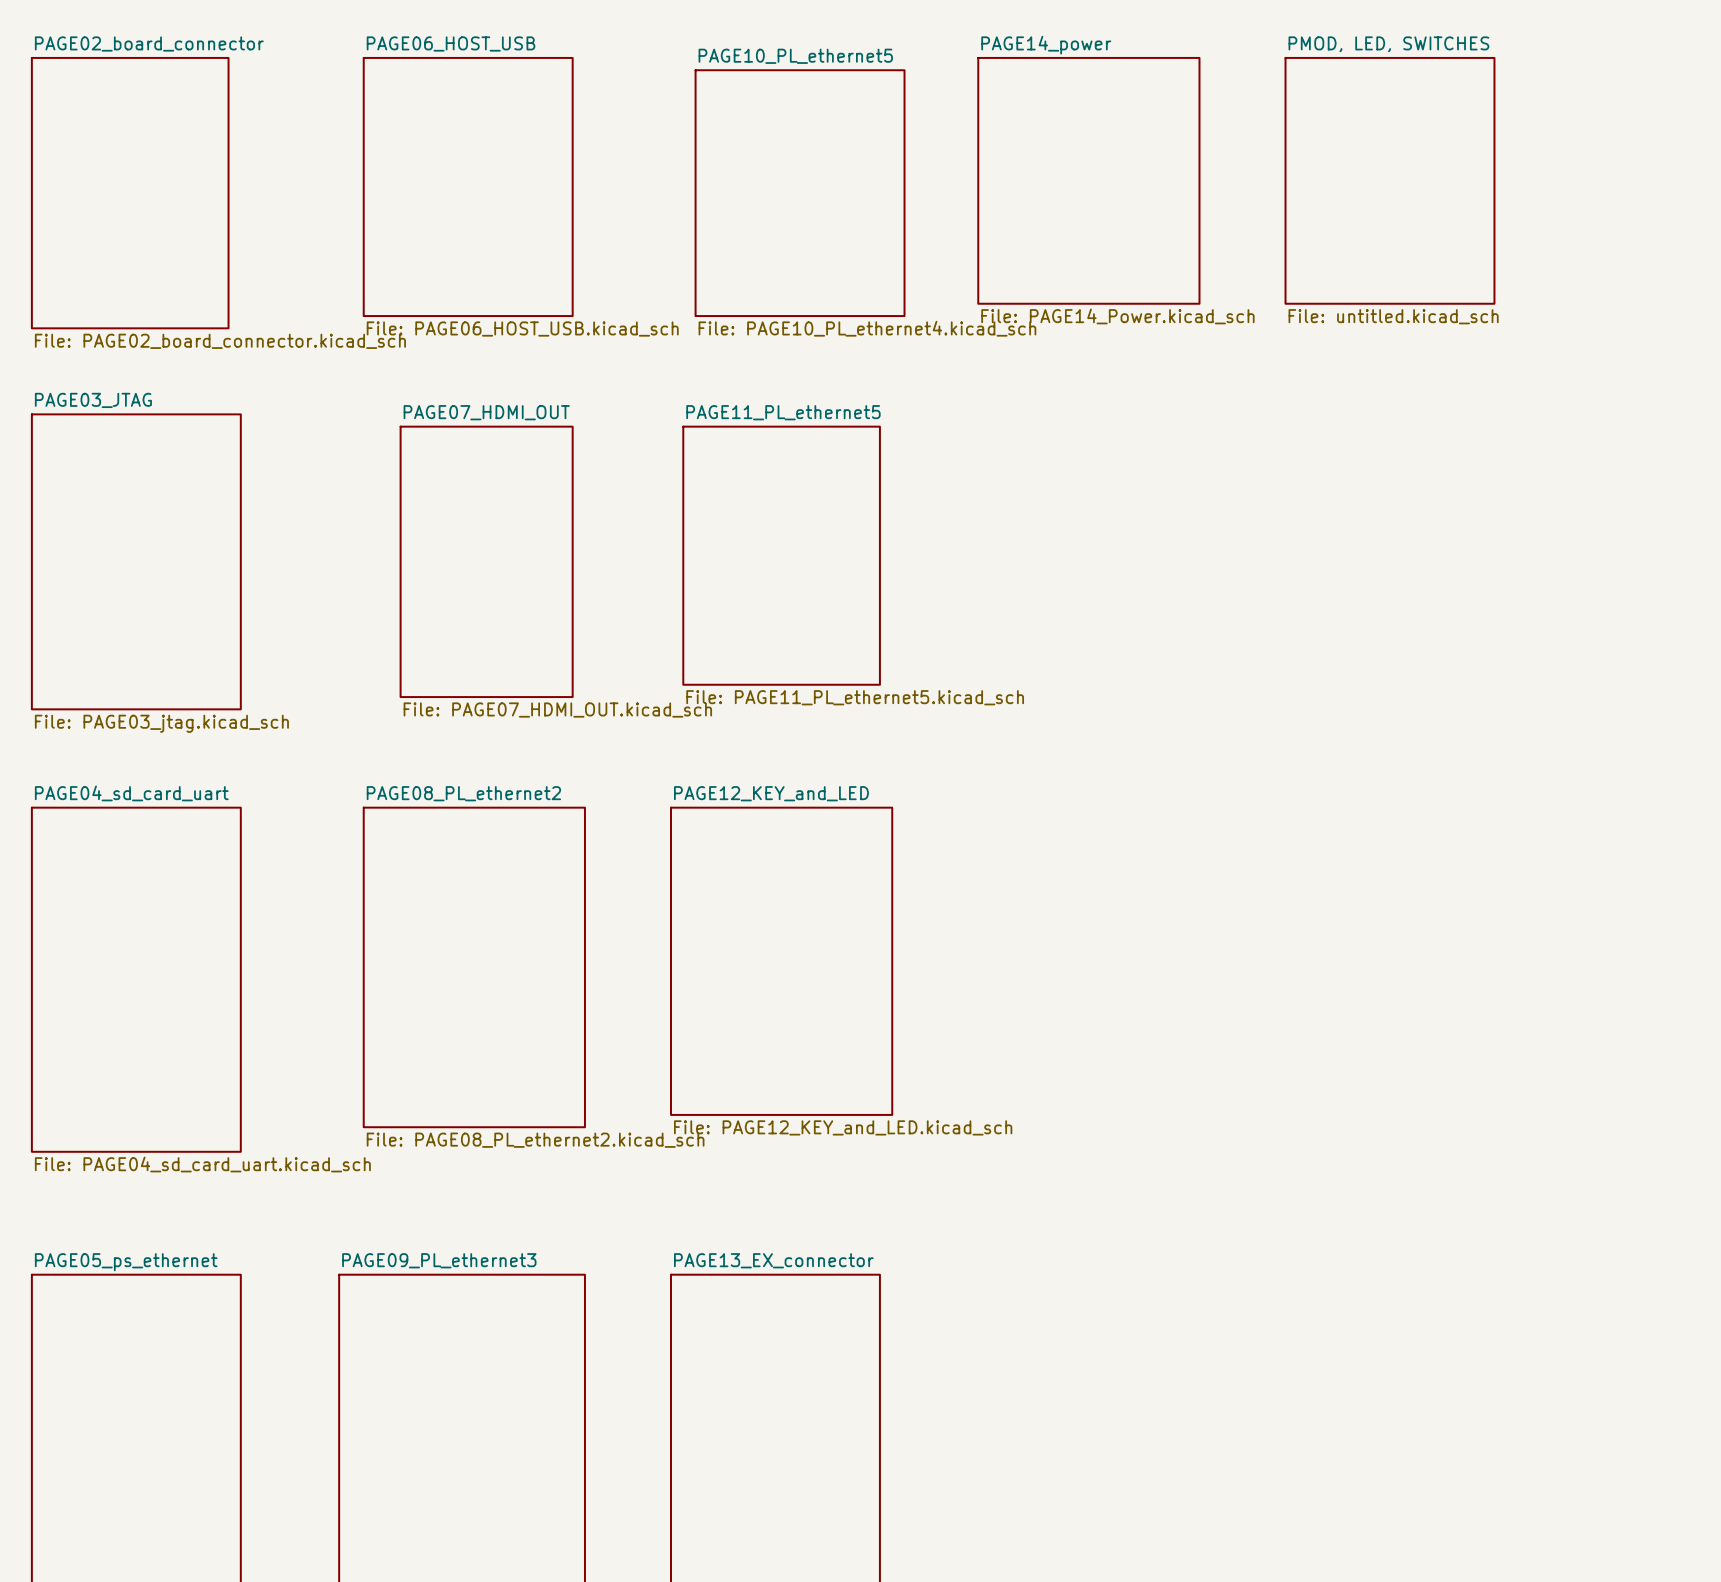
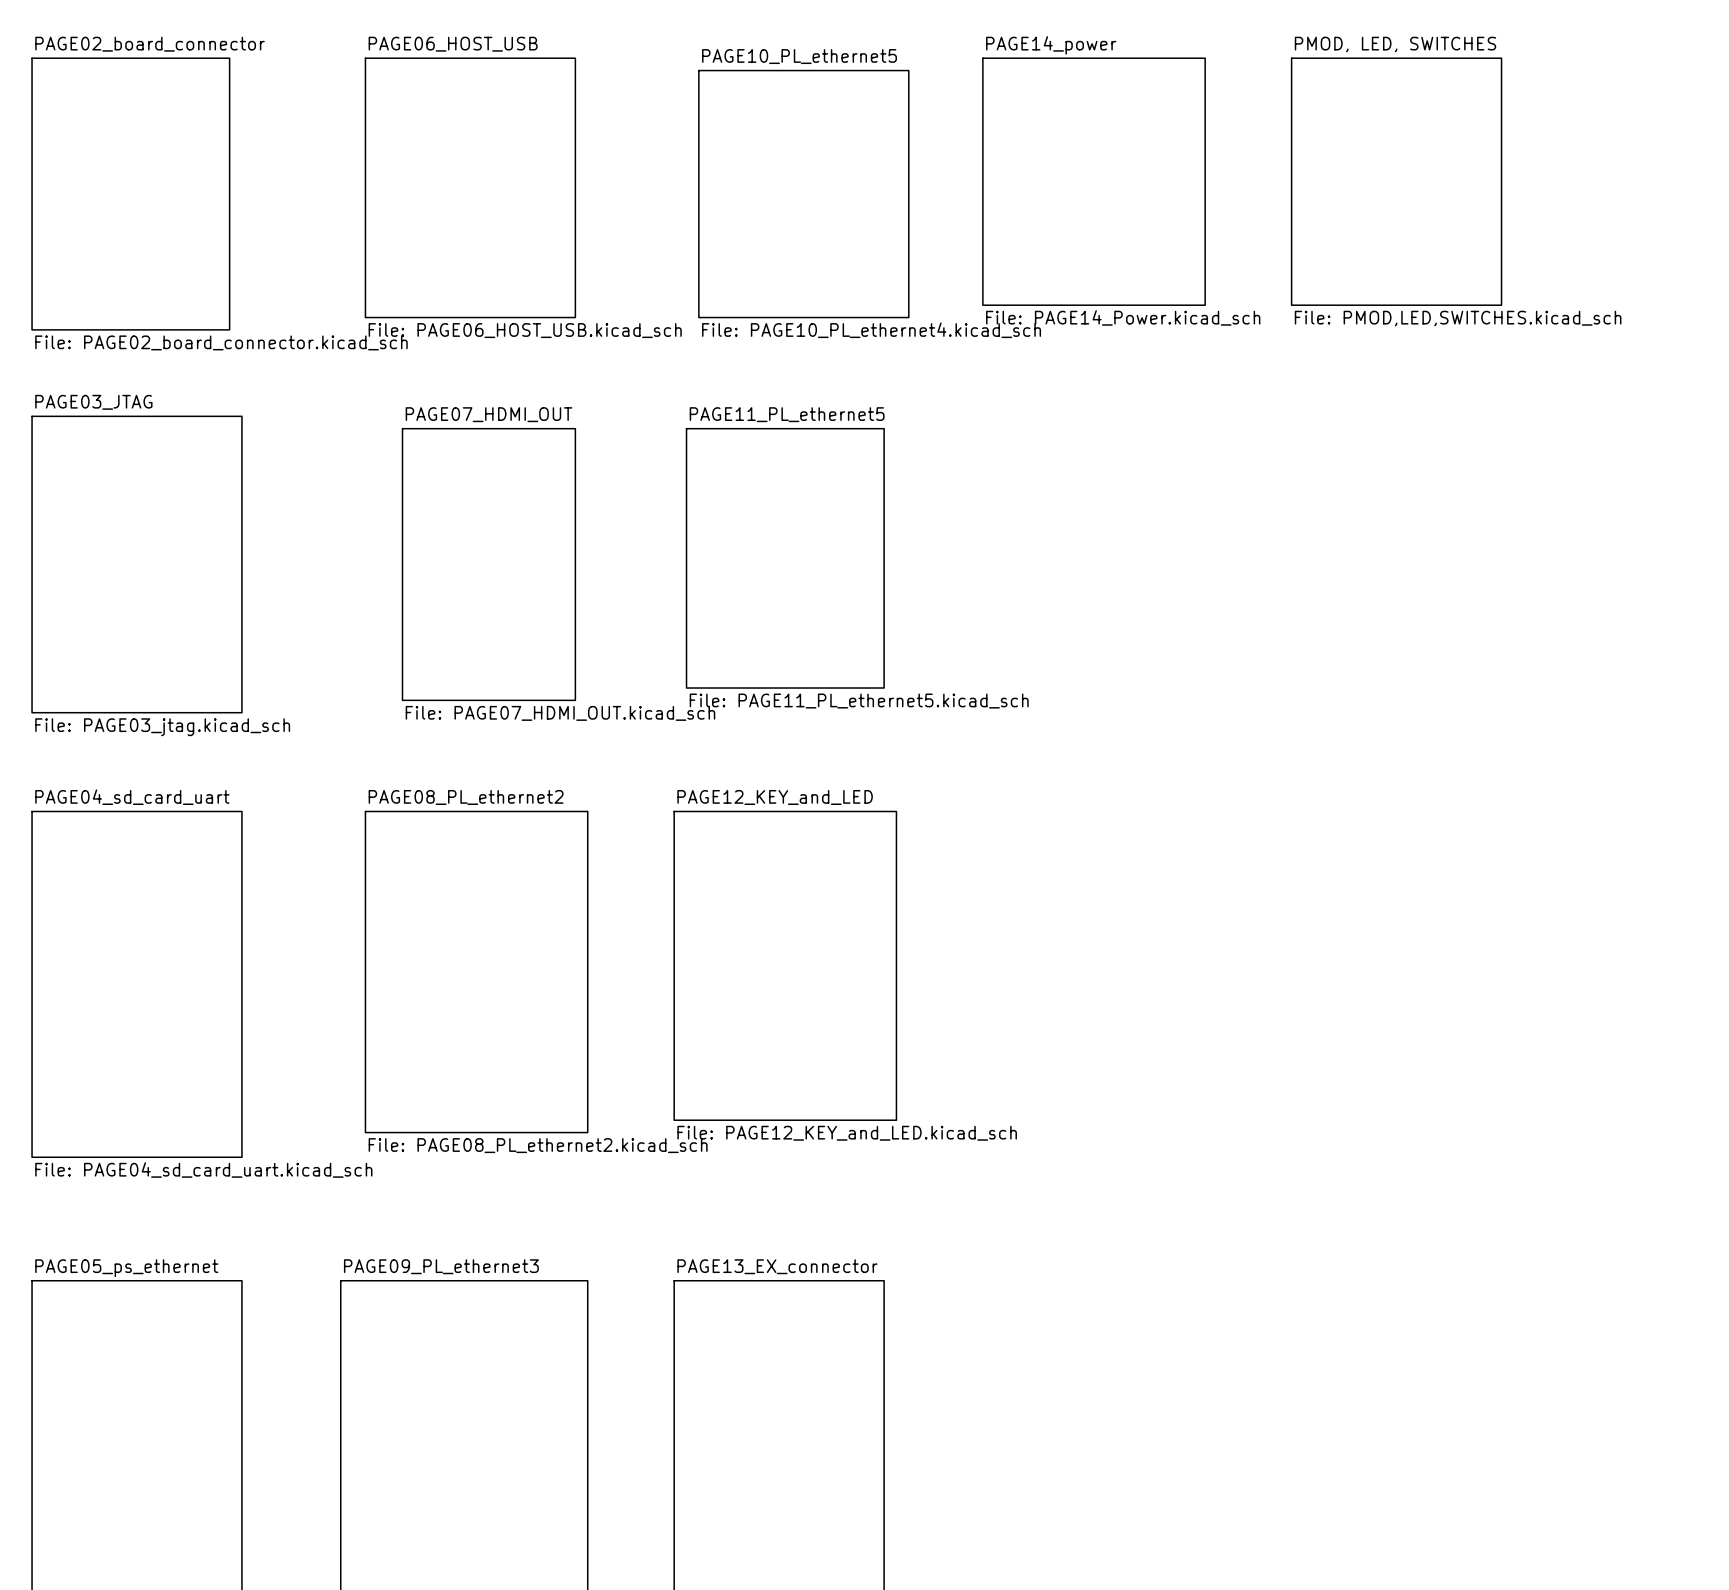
sheet PMOD, LED, SWITCHES value: File: untitled.kicad_sch (1393, 316) -> File: PMOD,LED,SWITCHES.kicad_sch (1458, 318)

